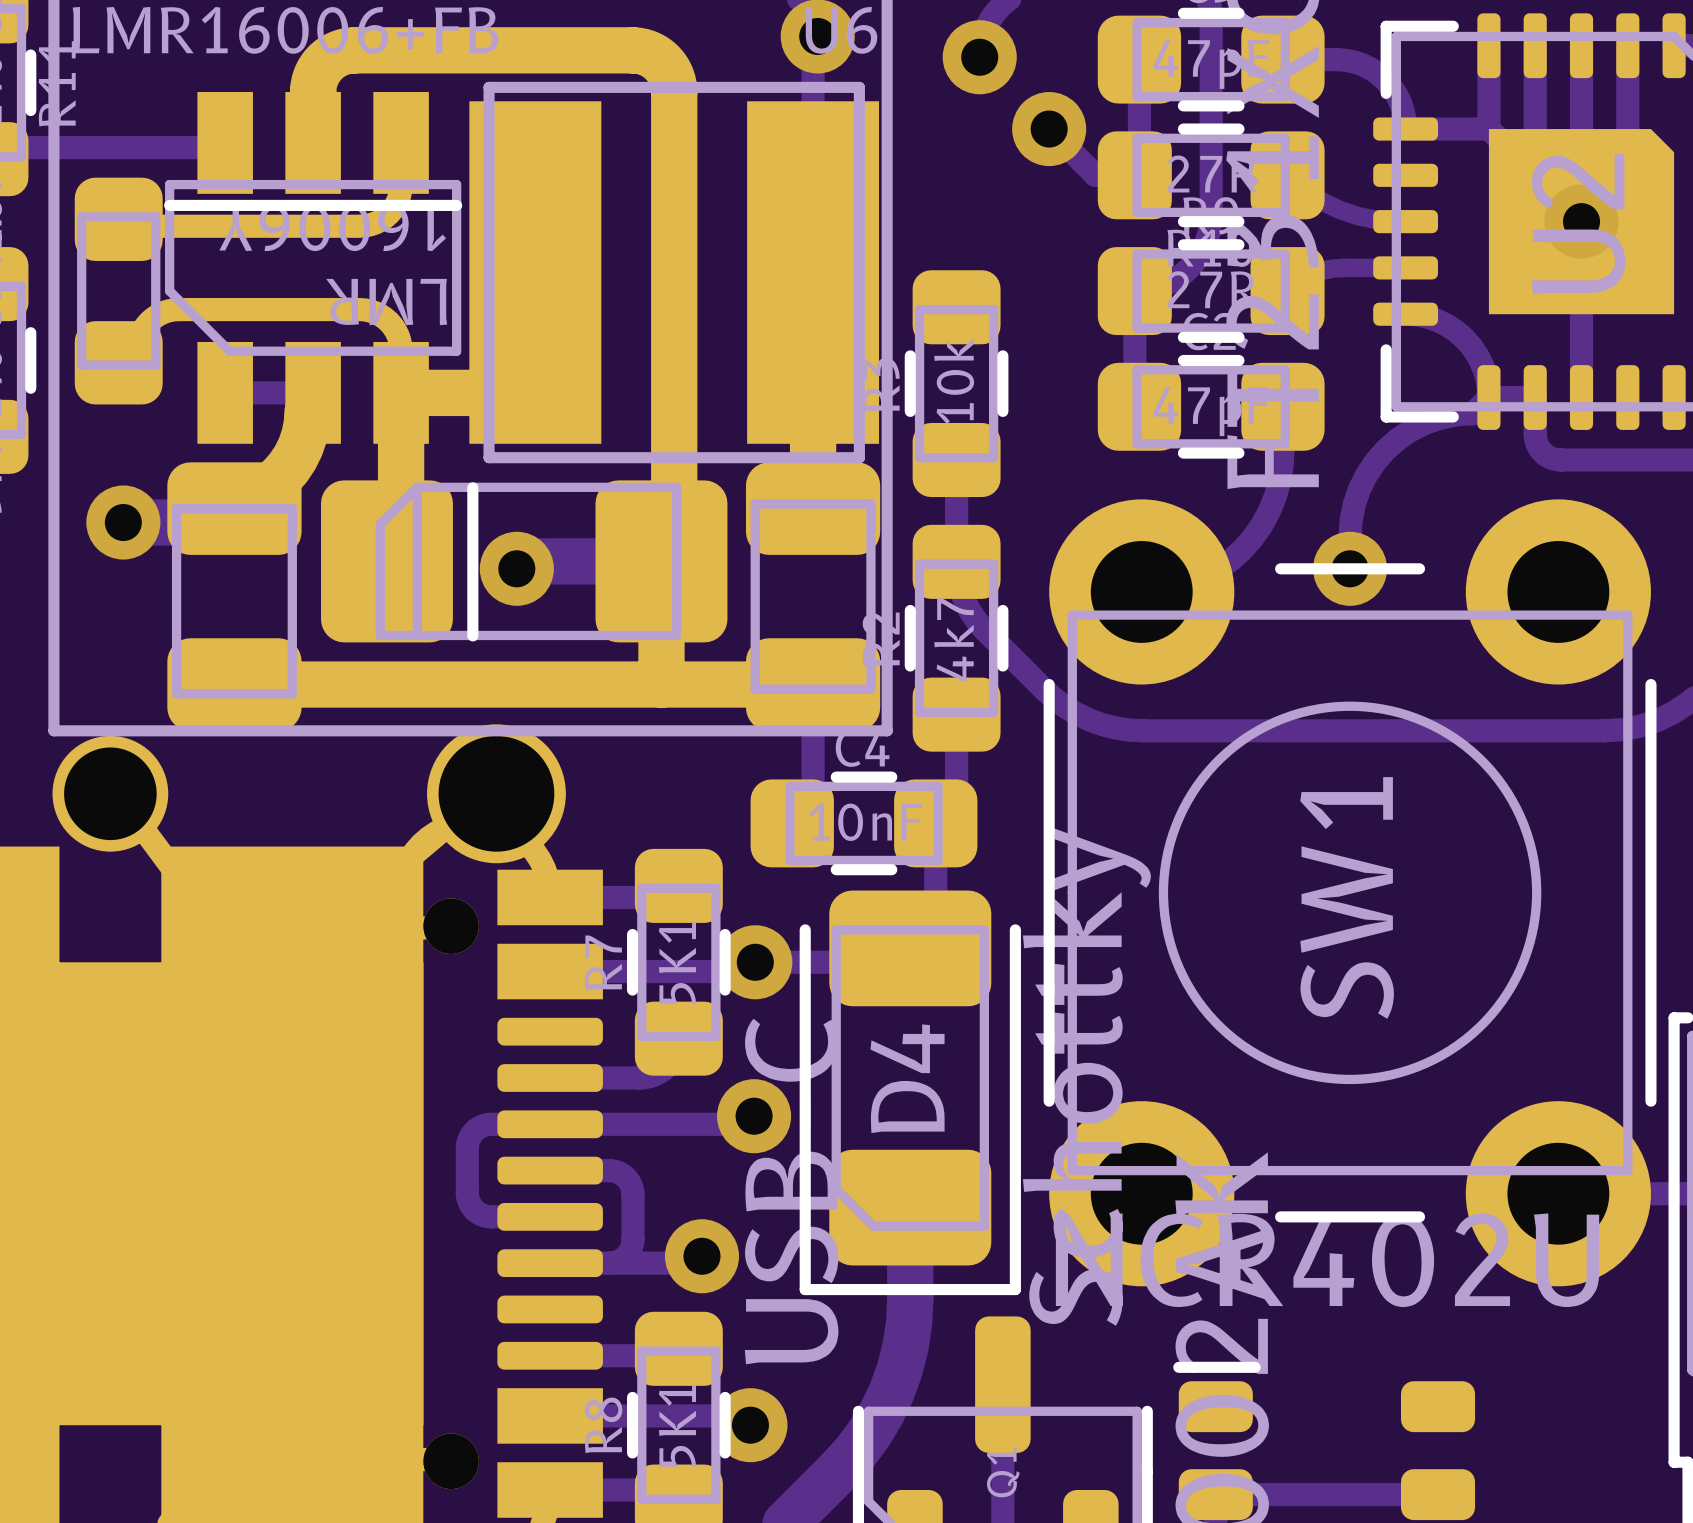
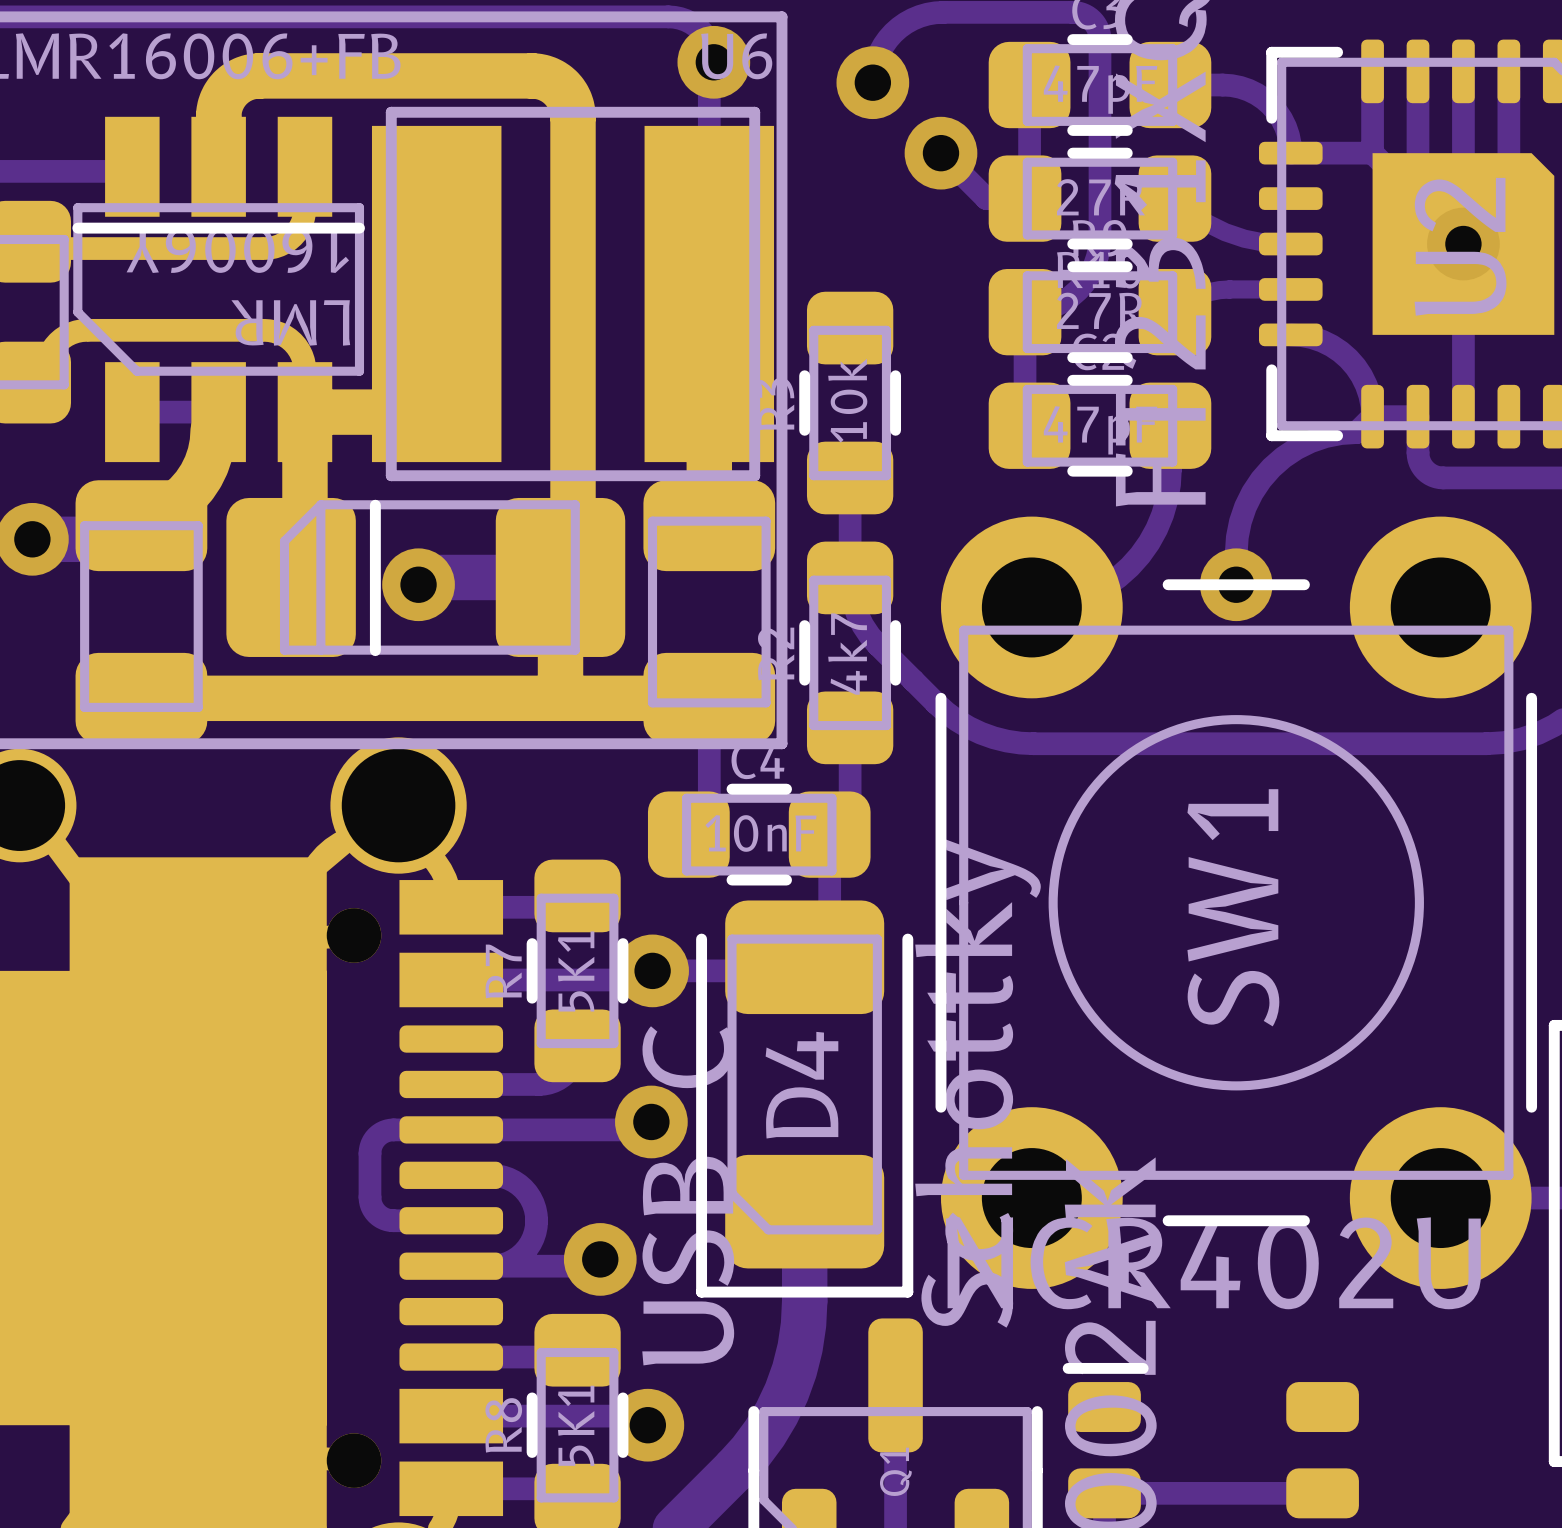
track: (590, 1170) (612, 1170) (620, 1173) (628, 1179) (632, 1191) (632, 1245) (623, 1258) (608, 1263) -> (491, 1175) (508, 1178) (523, 1188) (533, 1203) (536, 1220) (533, 1238) (523, 1252) (508, 1262) (491, 1266)

